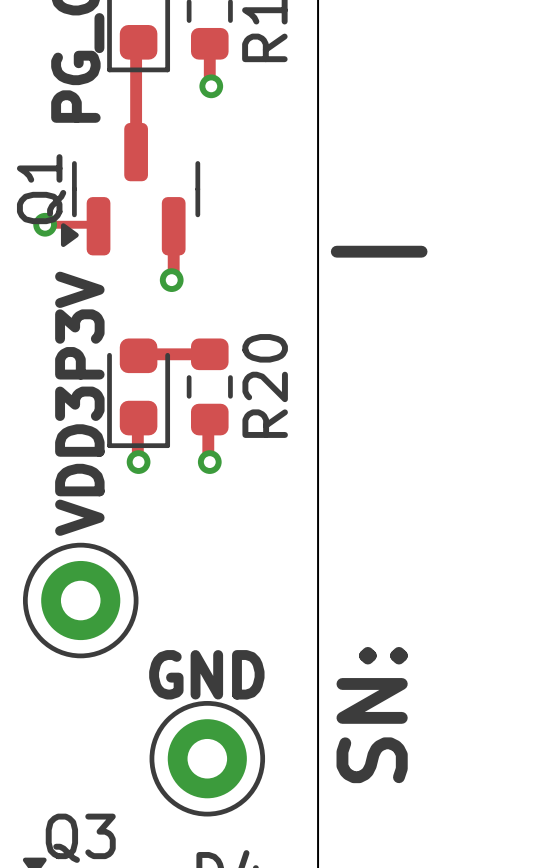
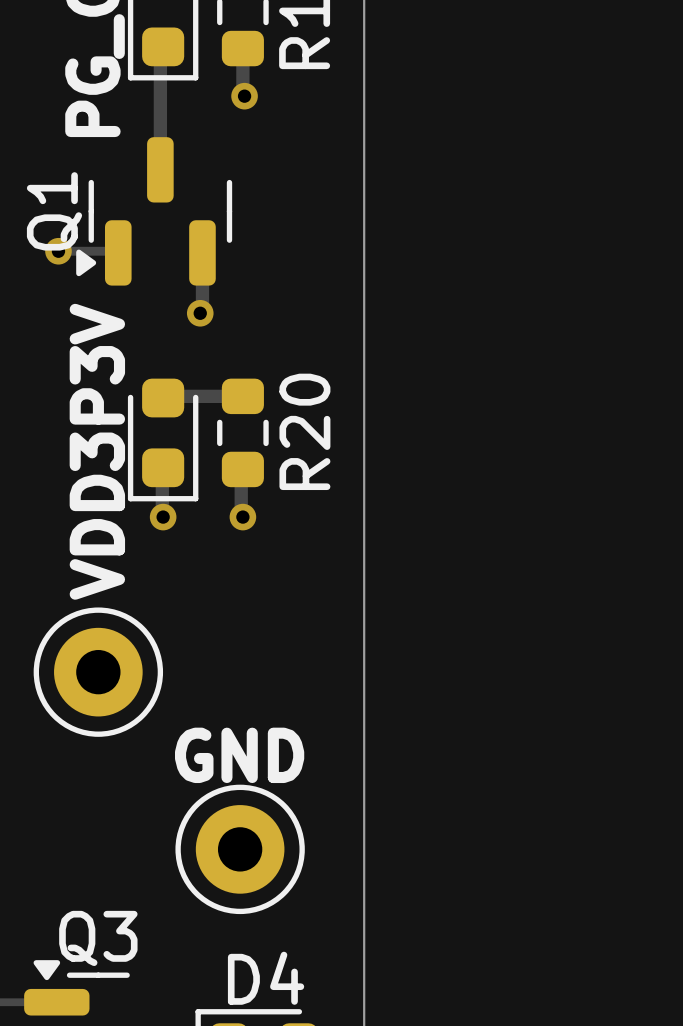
text: SN: | (379, 514) -> none

